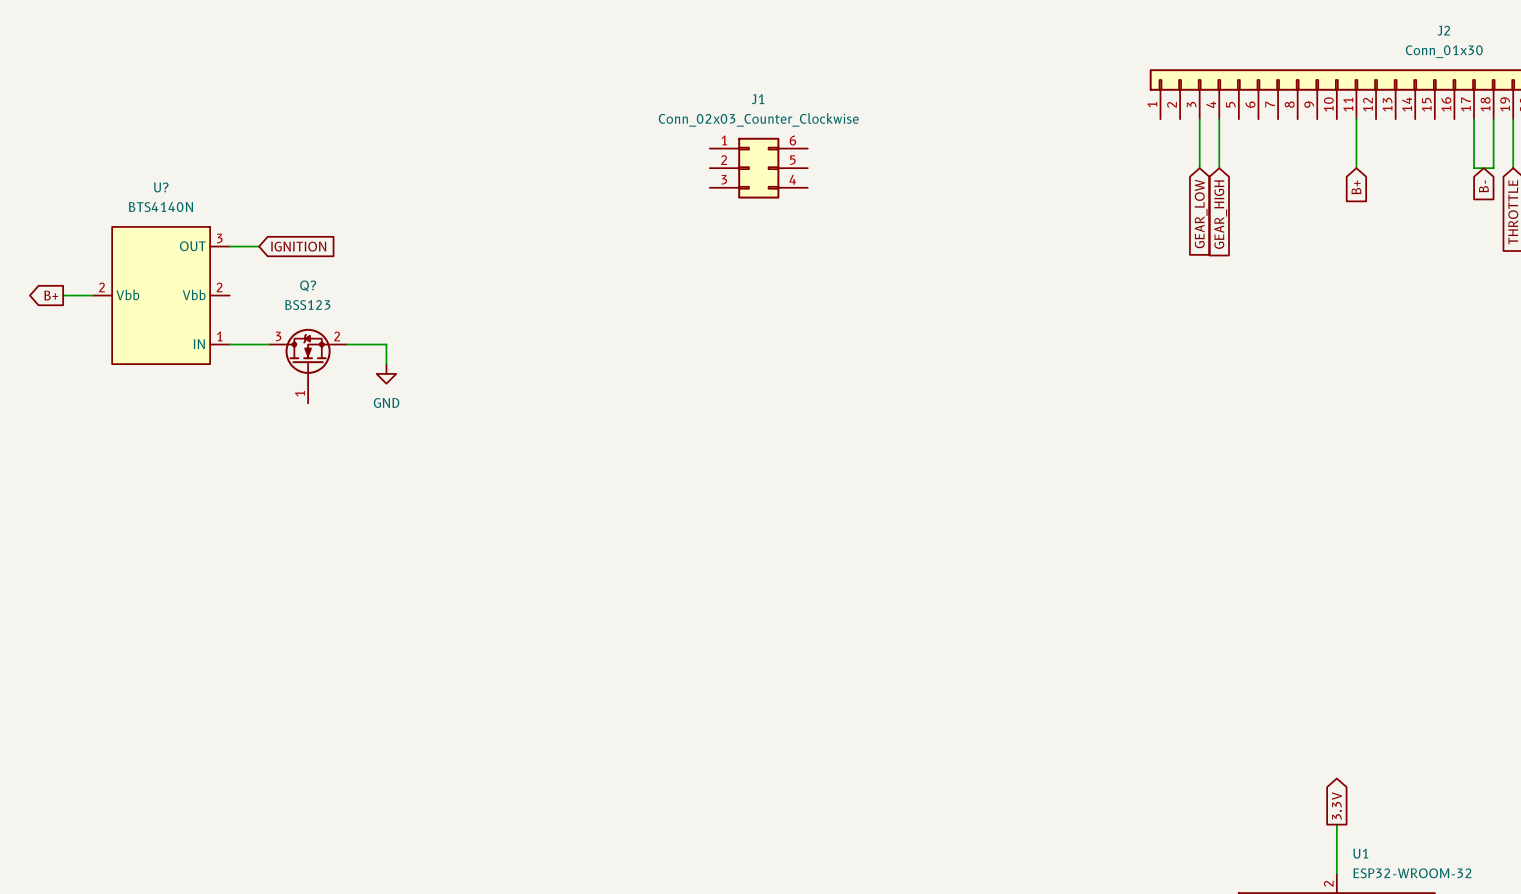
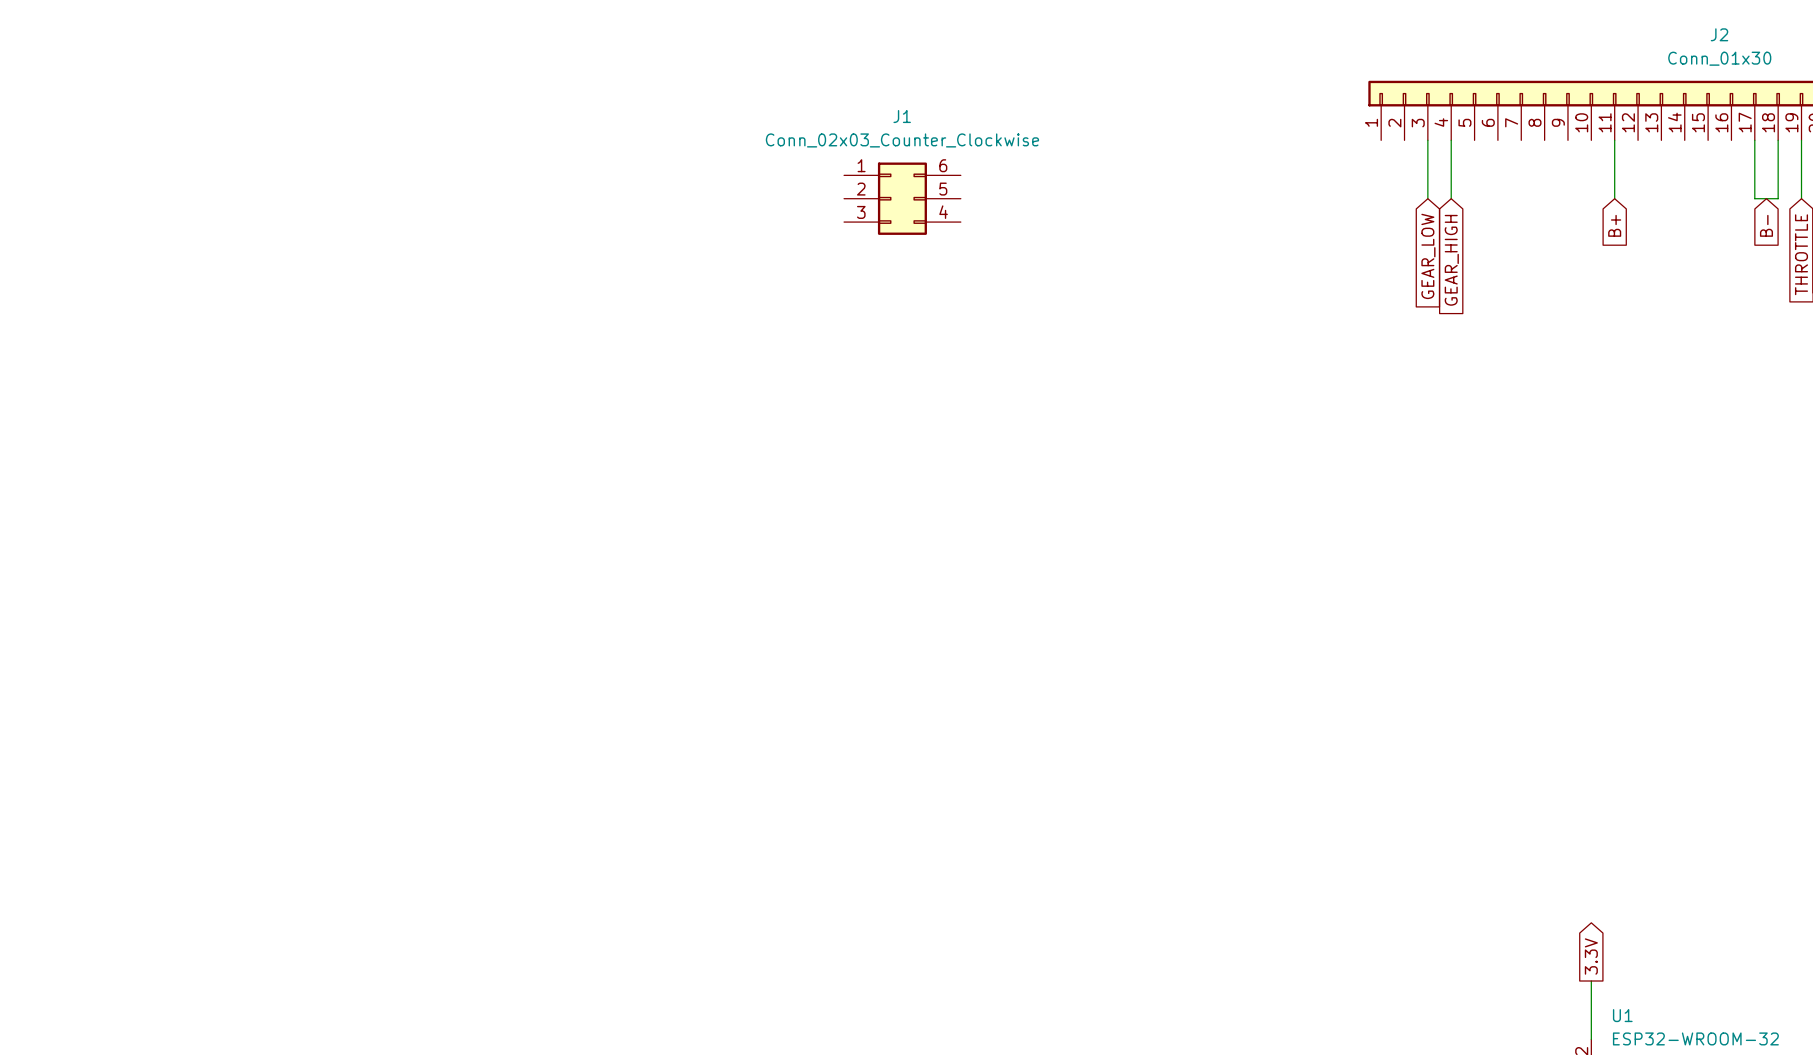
wire: (229, 246) (259, 246) -> none
global label: IGNITION (298, 246) -> none
global label: B+ (51, 295) -> none
wire: (63, 295) (92, 295) -> none
U?: BTS4140N (161, 295) -> none
wire: (229, 344) (268, 344) -> none
wire: (347, 344) (386, 344) (386, 364) -> none
Q?: BSS123 (308, 366) -> none
power symbol: GND (386, 373) -> none

